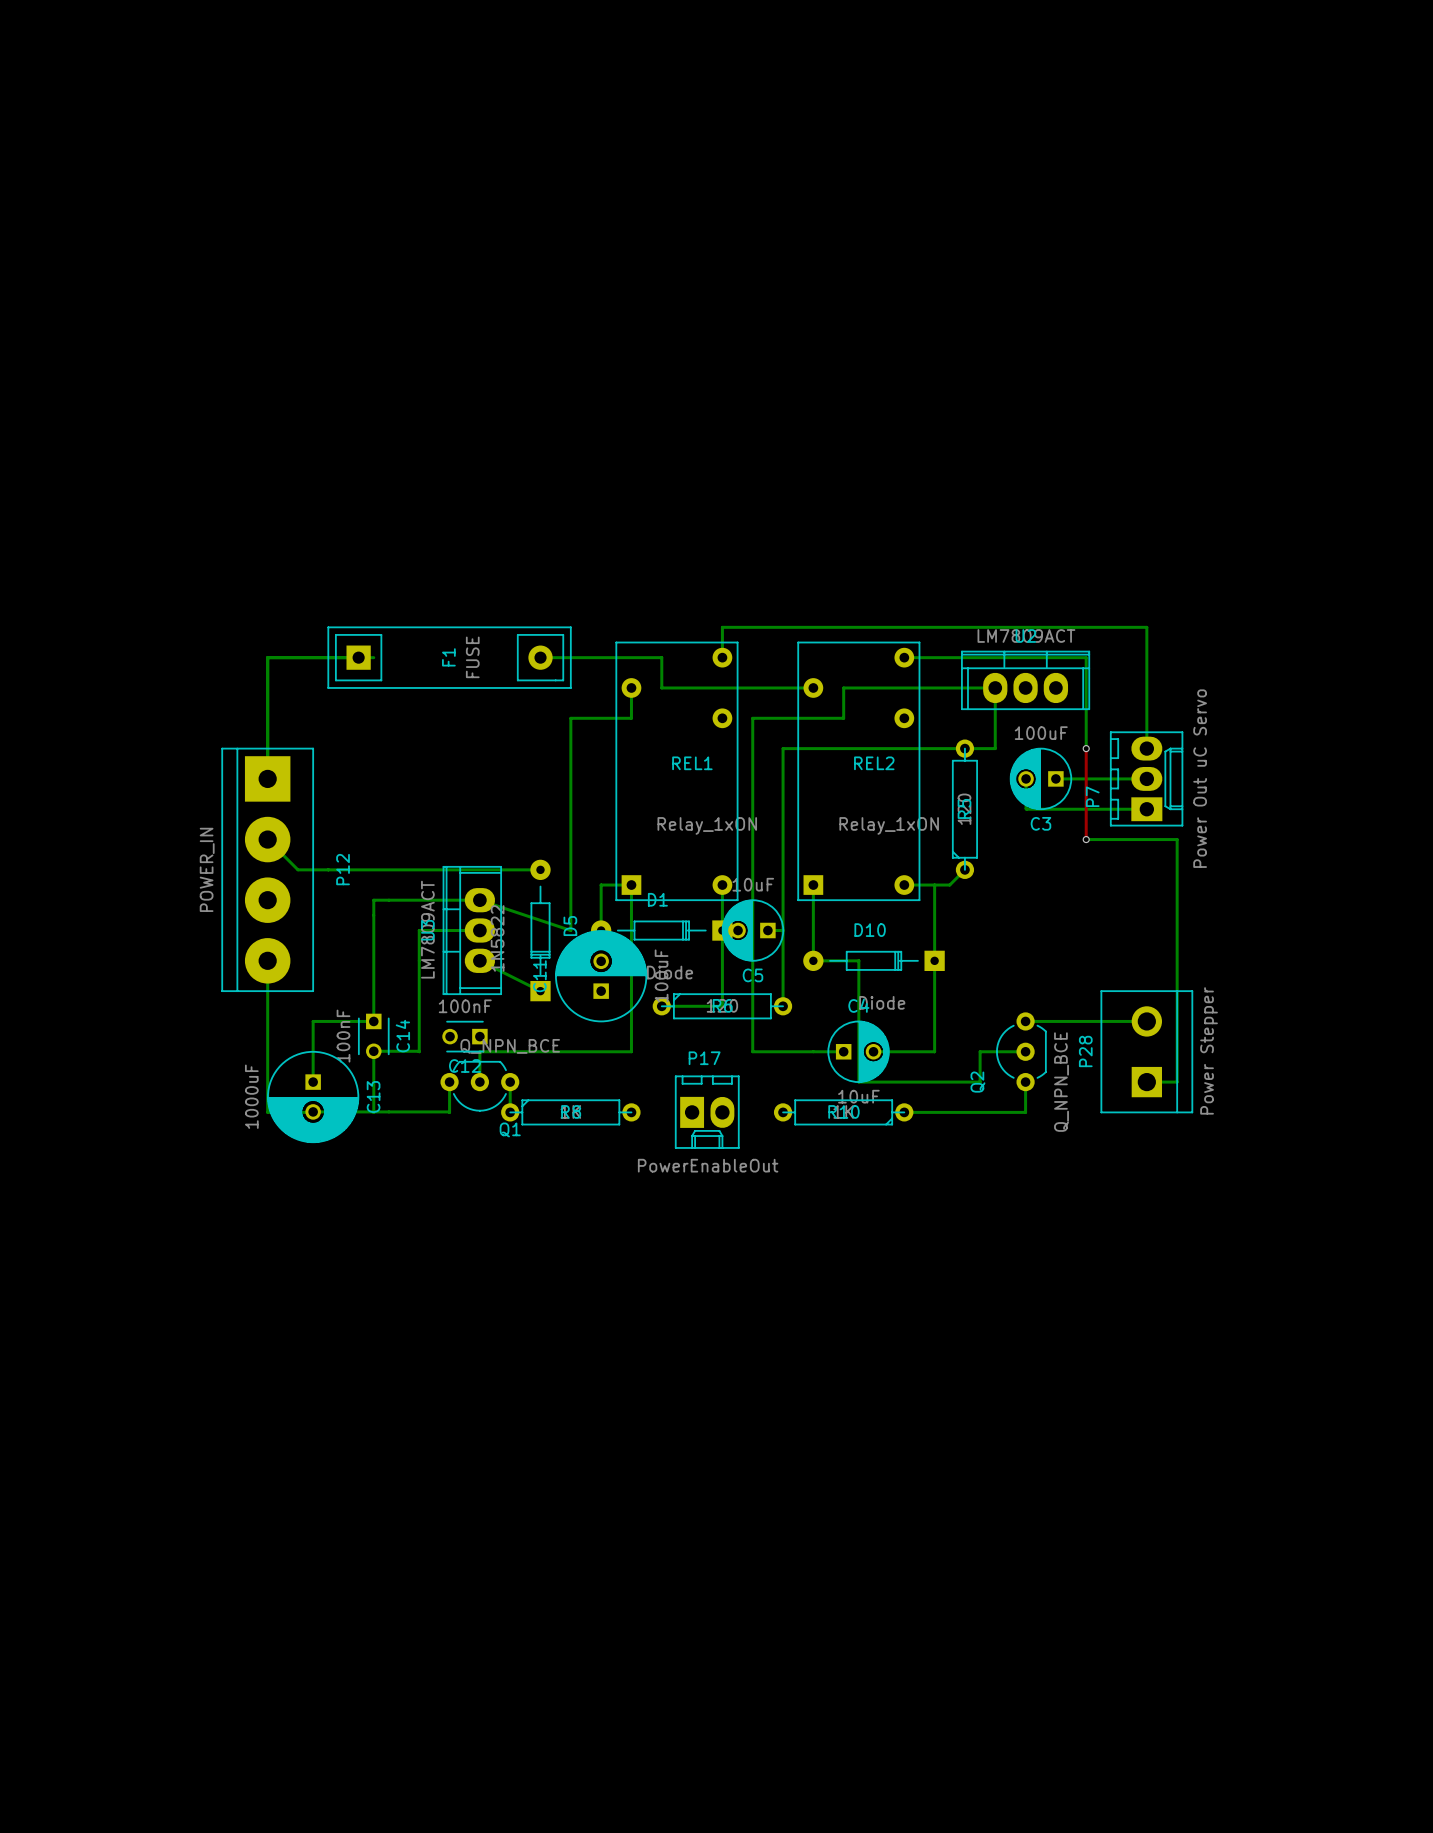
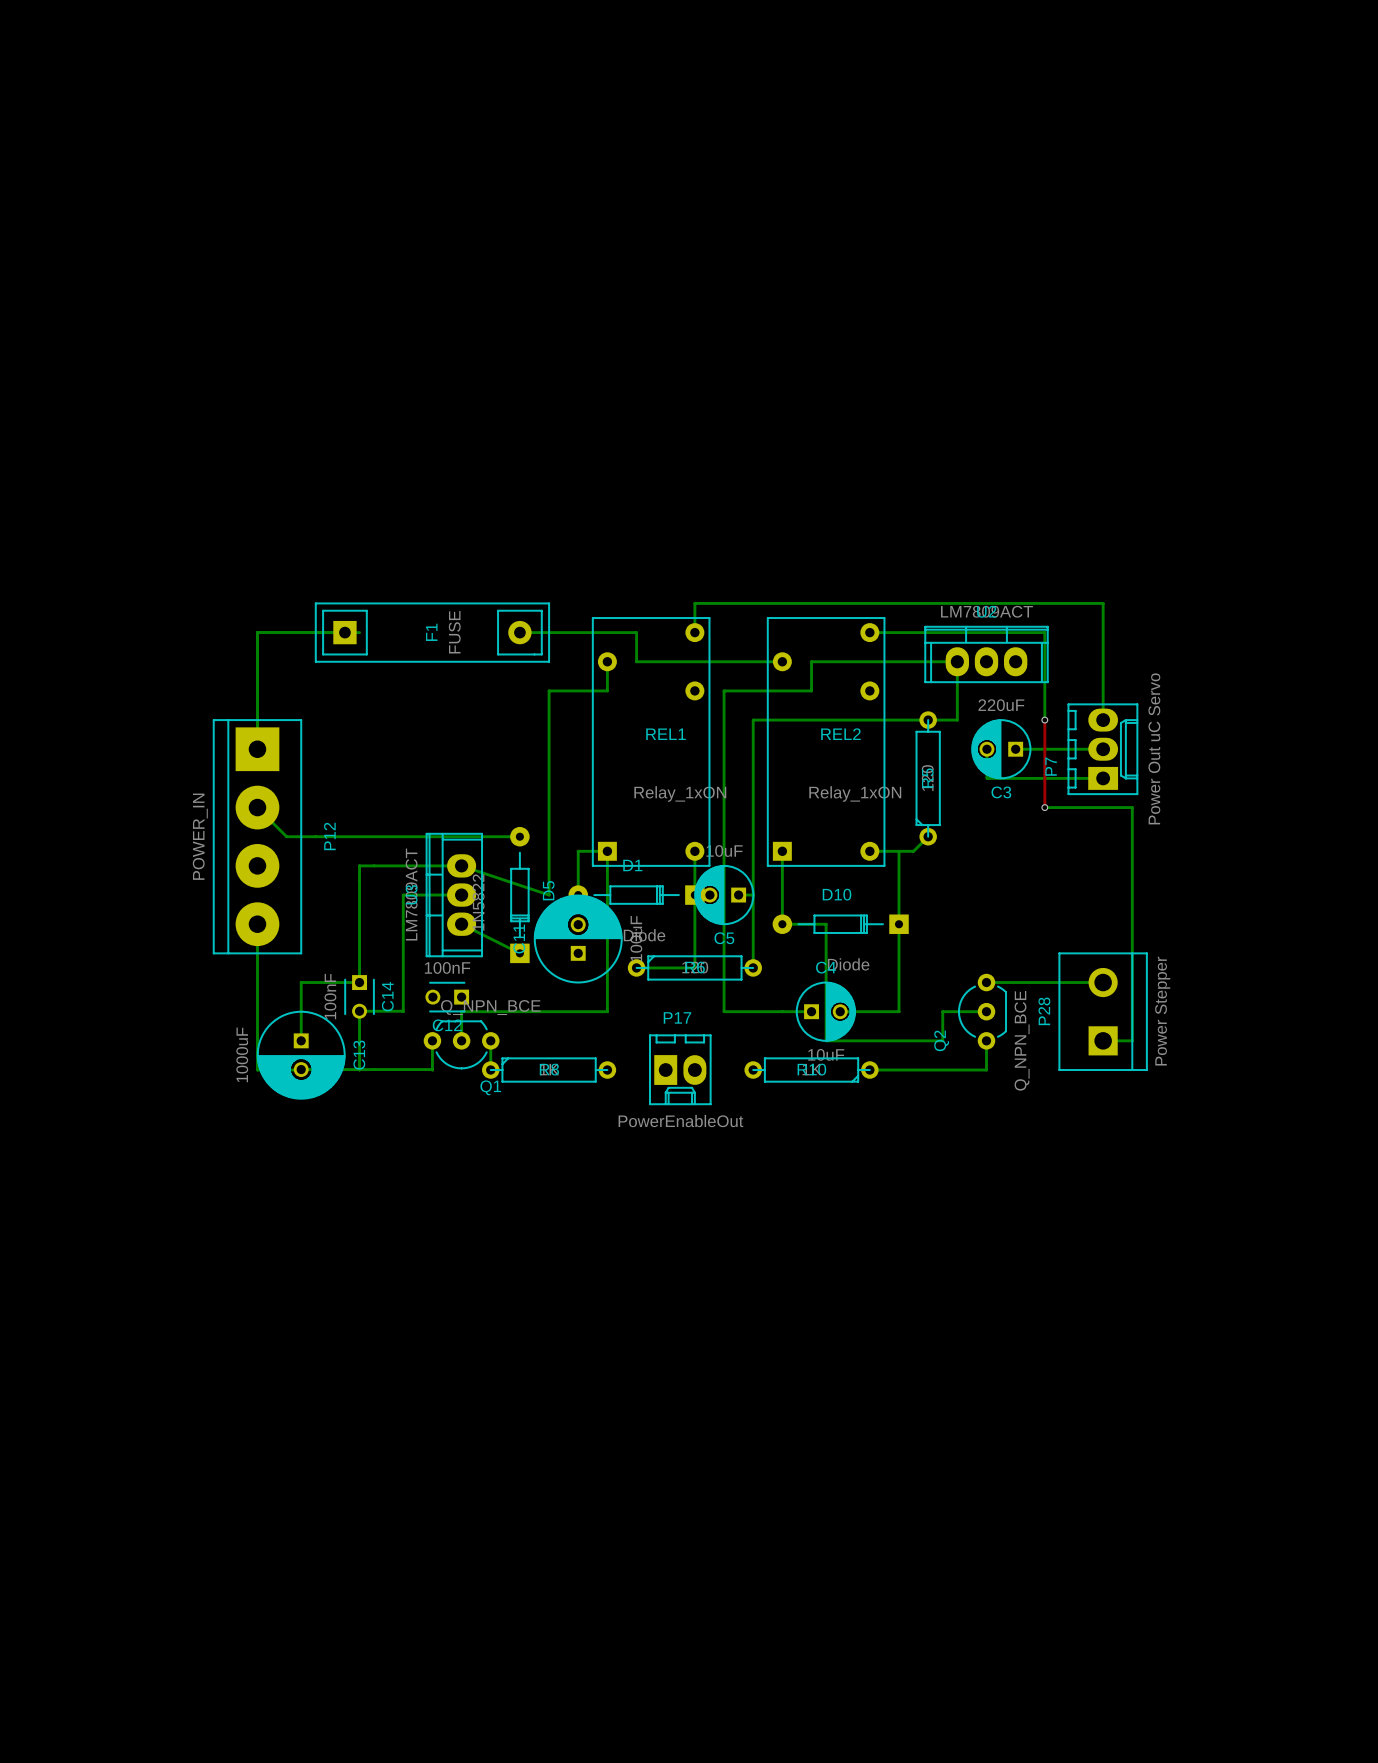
C3 value: 100uF (1041, 733) -> 220uF (1001, 705)

